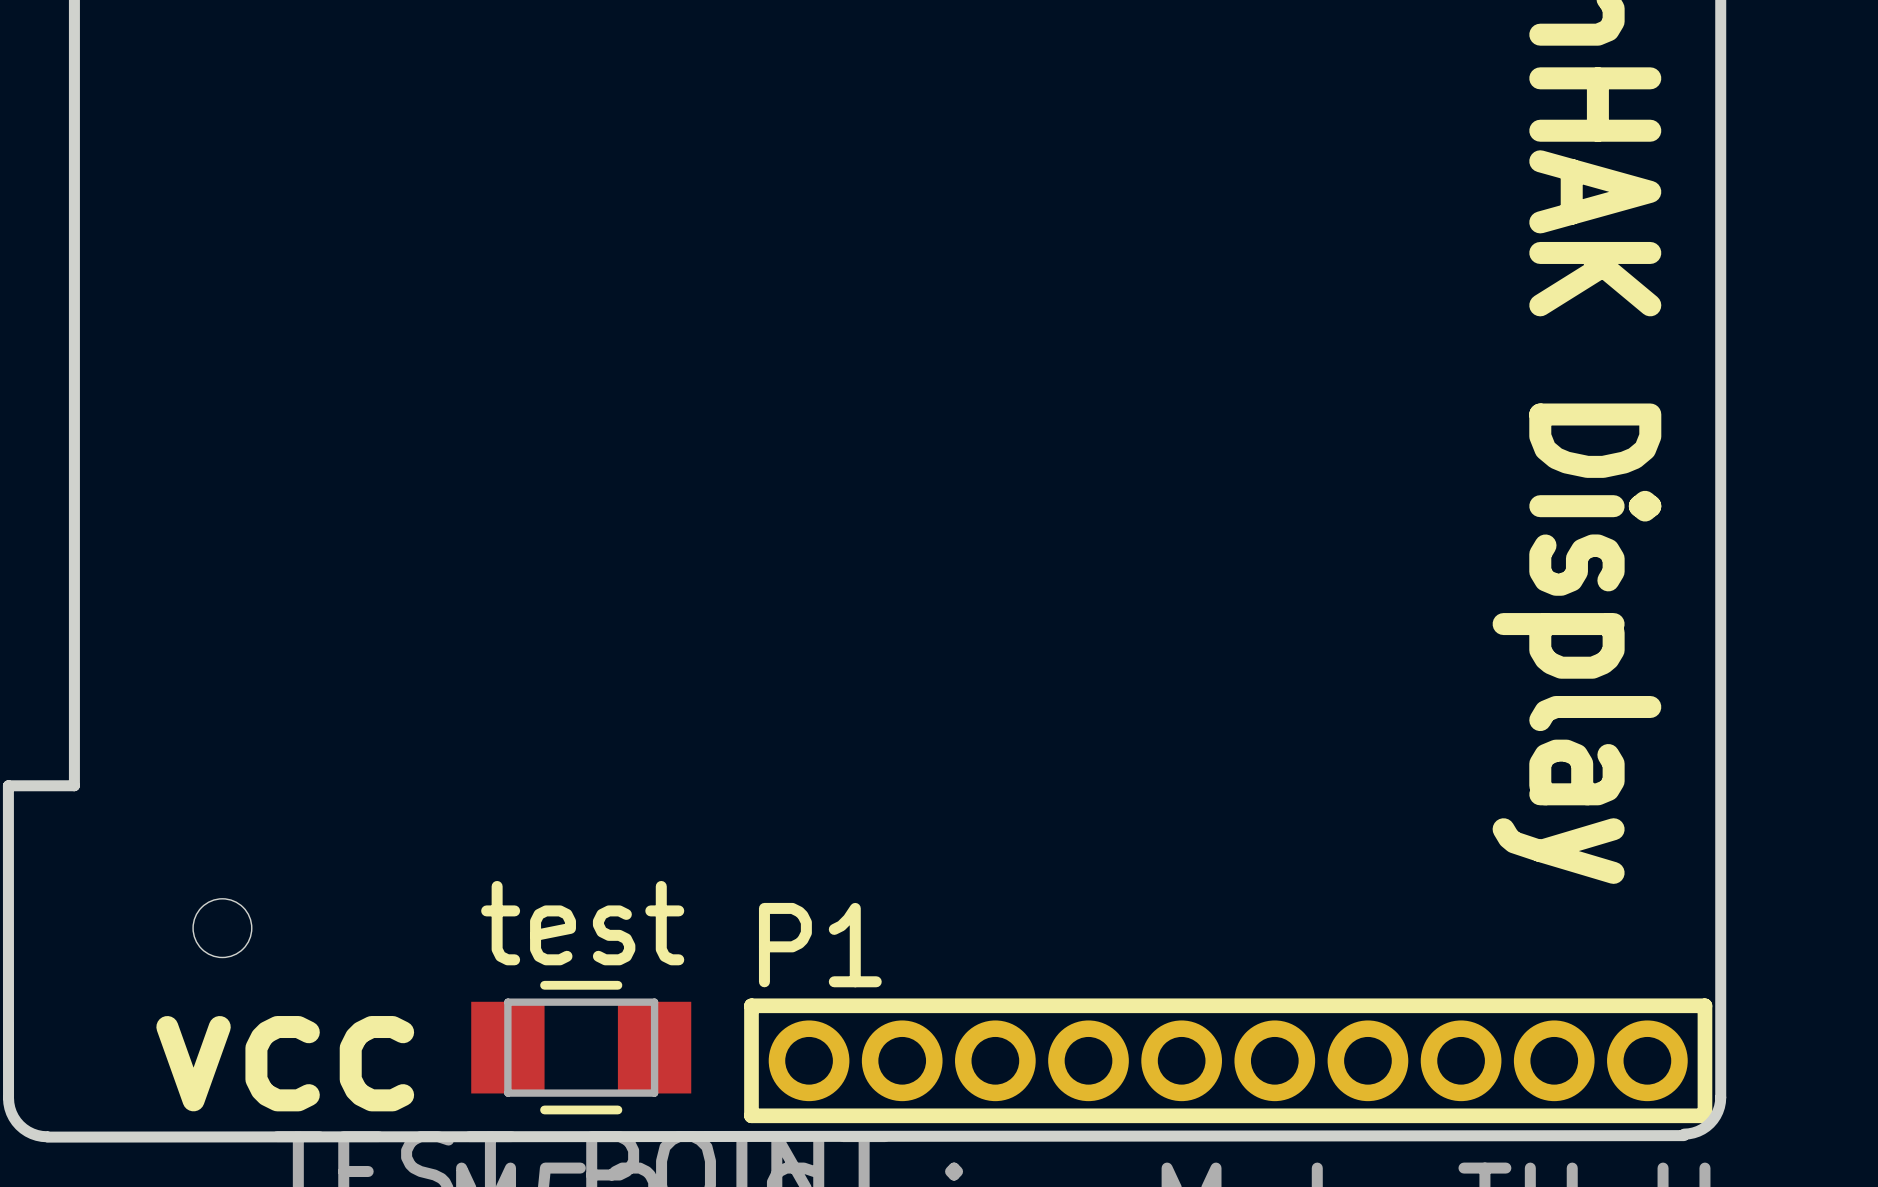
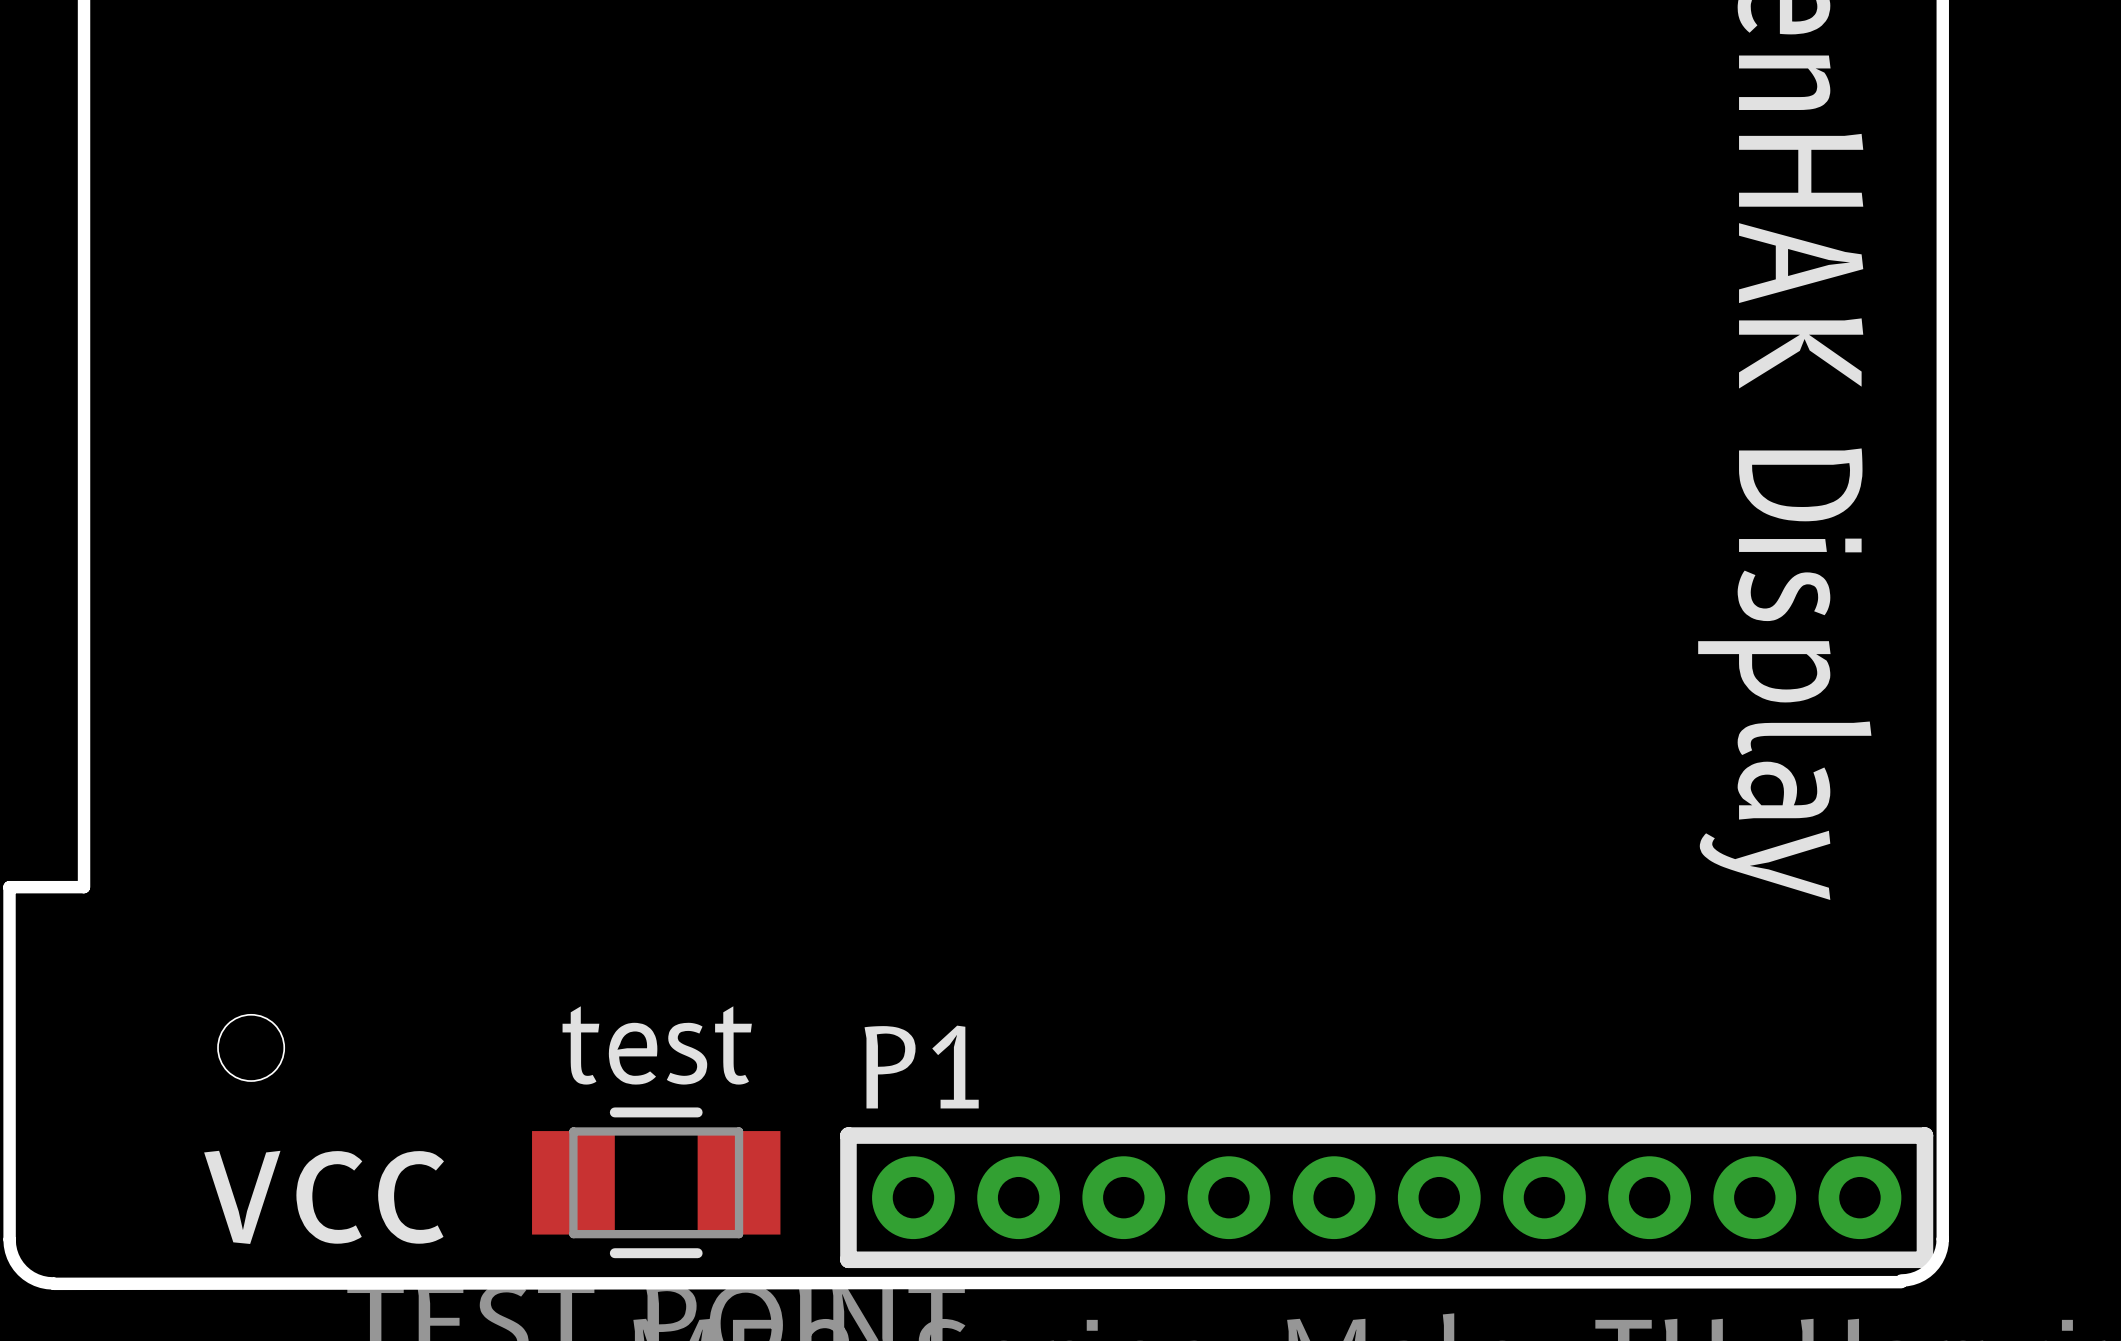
P1 footprint: [744, 998, 1713, 1124] -> [840, 1127, 1934, 1269]

